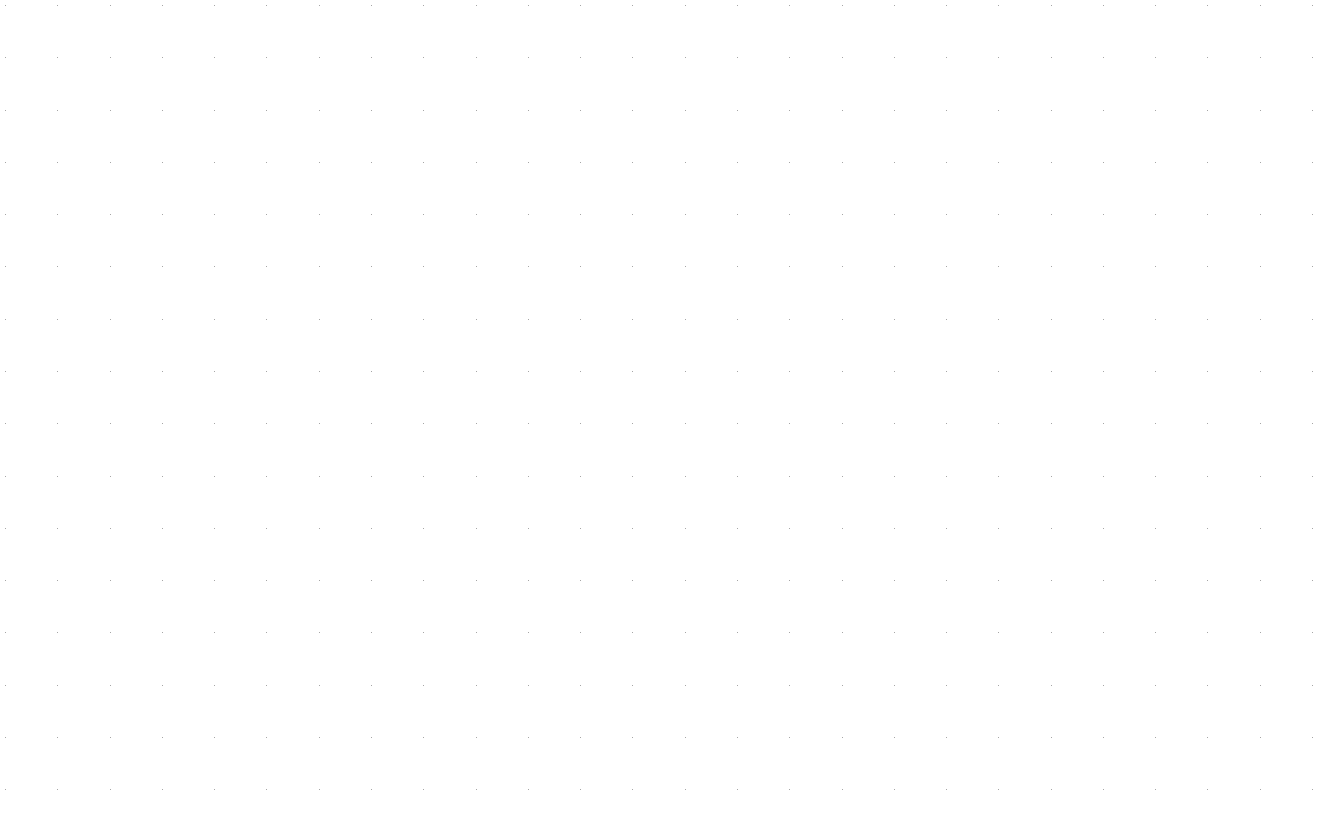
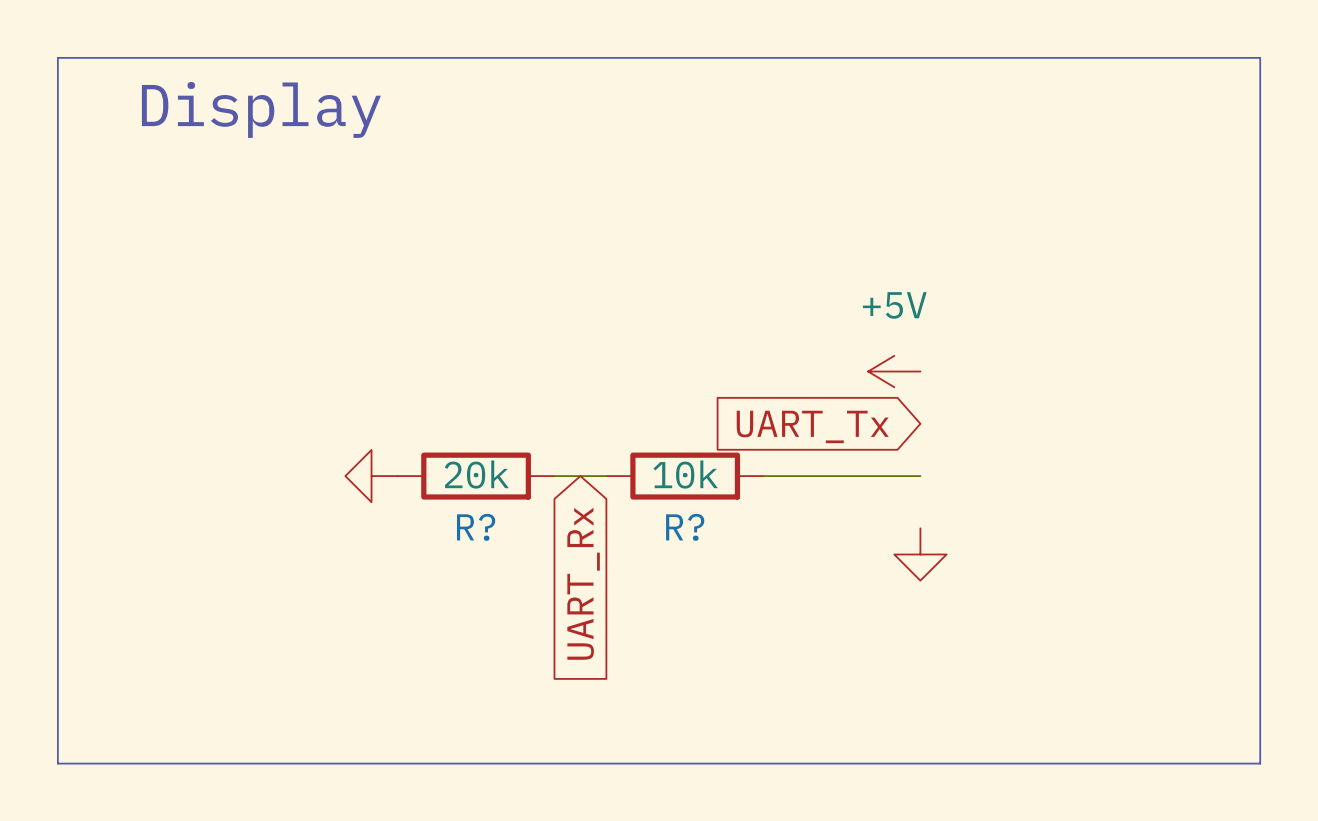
line: none -> (57, 57) (57, 763) (1260, 763) (1260, 57) (57, 57)
text: none -> Display (261, 109)
power symbol: none -> +5V (894, 371)
global label: none -> UART_Tx (812, 426)
power symbol: none -> (371, 476)
R?: none -> 20k (476, 476)
wire: none -> (554, 476) (606, 476)
R?: none -> 10k (685, 476)
wire: none -> (763, 476) (920, 476)
power symbol: none -> (920, 554)
global label: none -> UART_Rx (583, 583)

